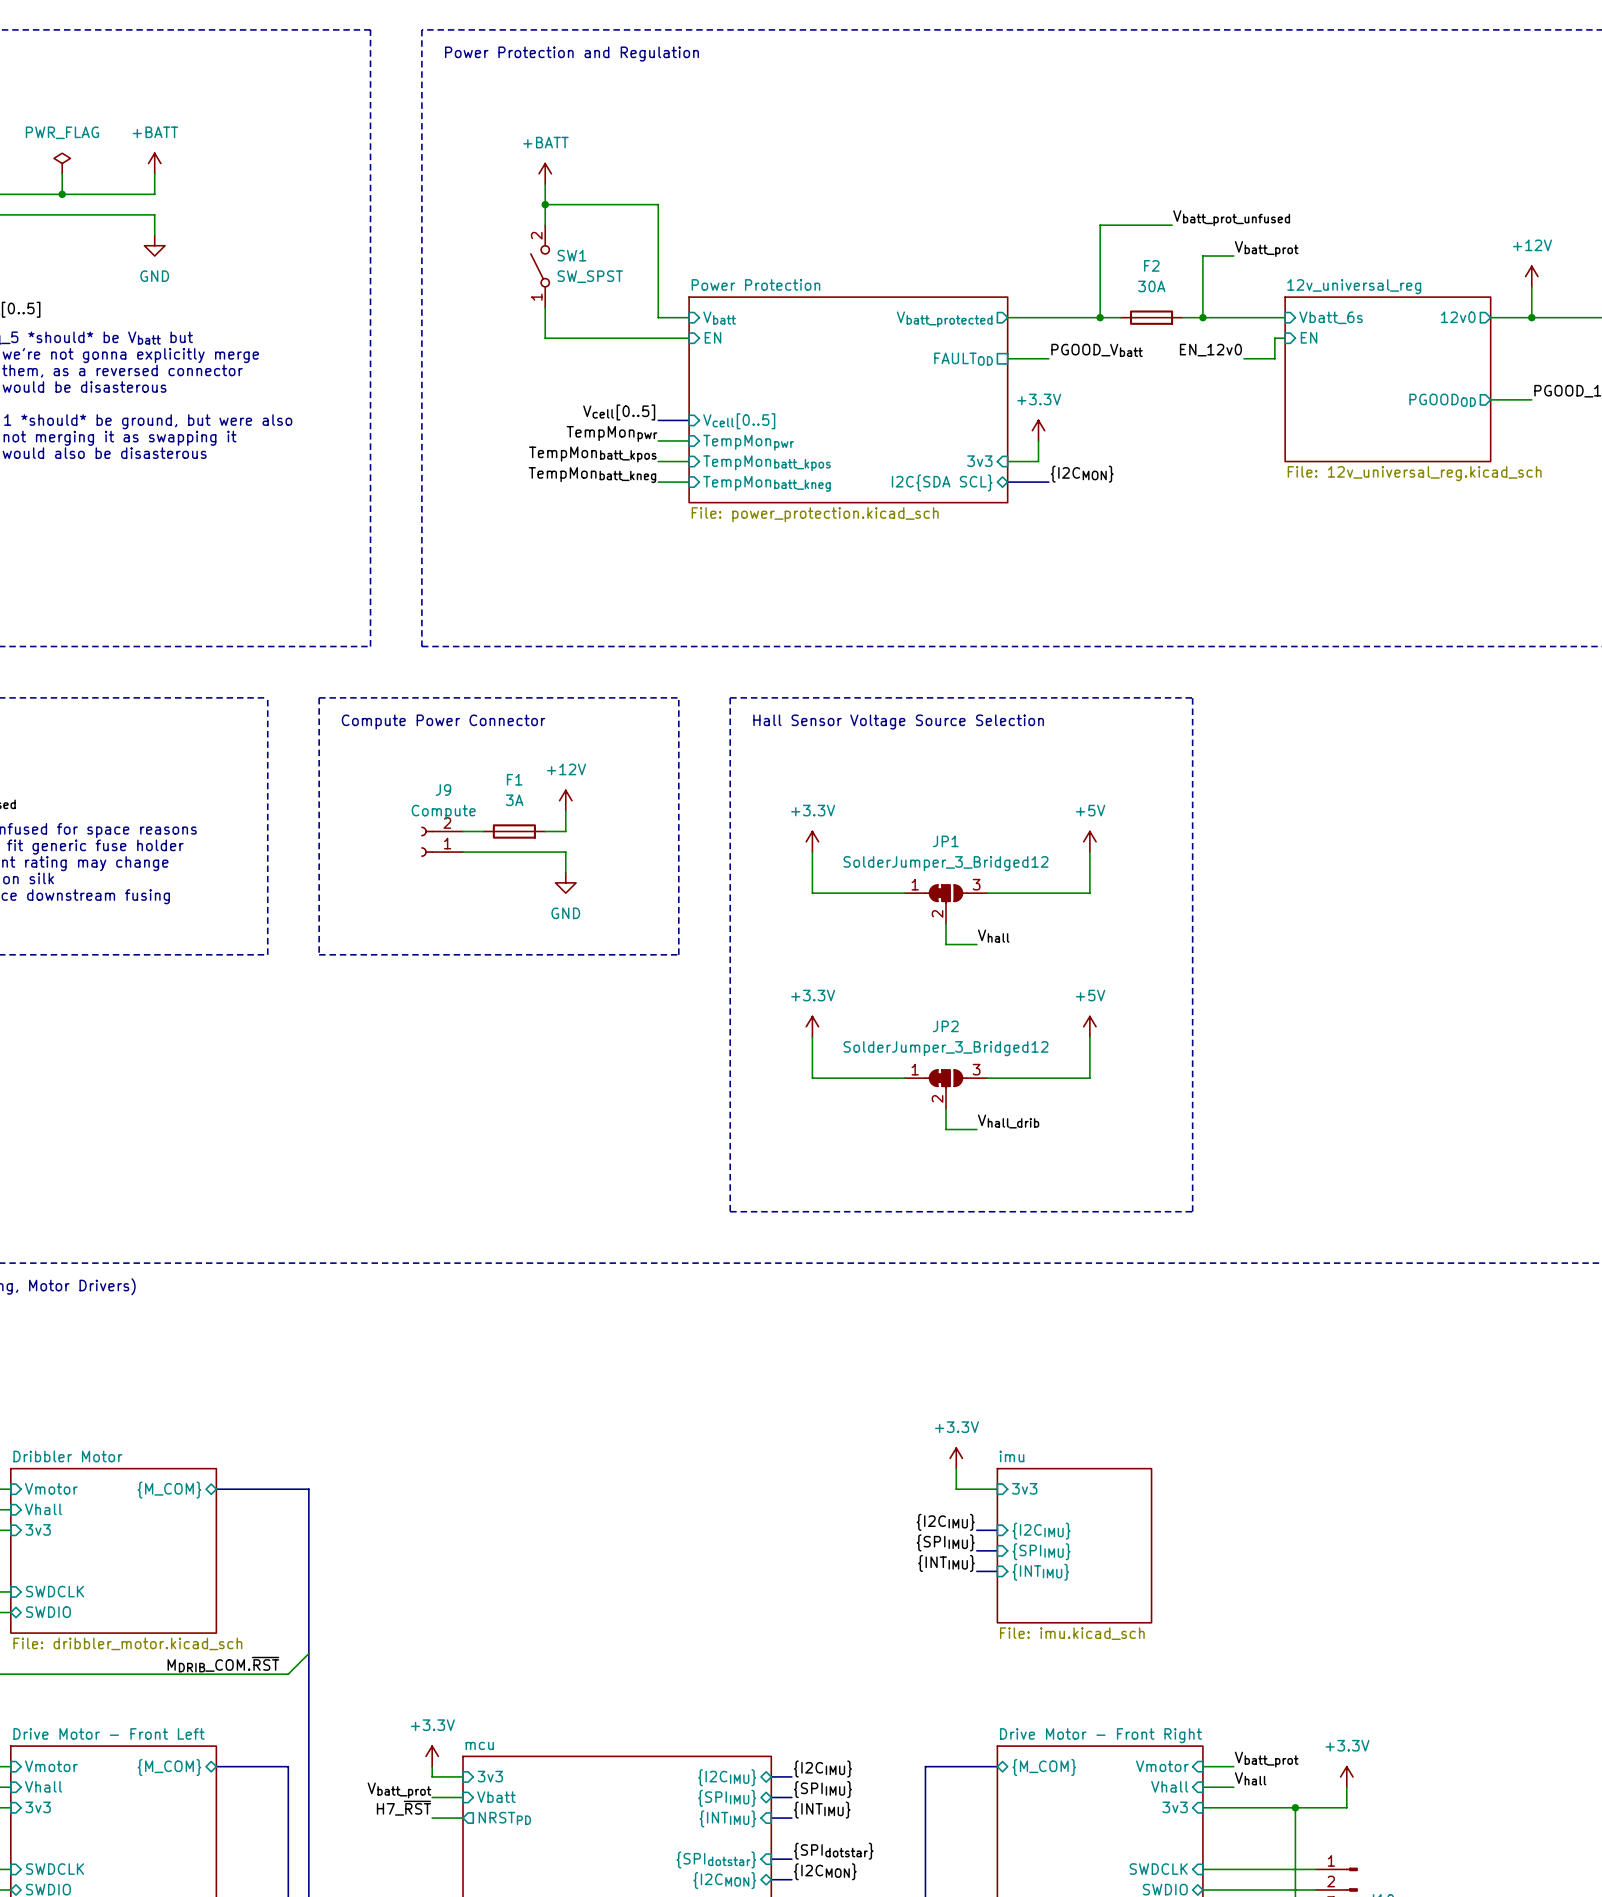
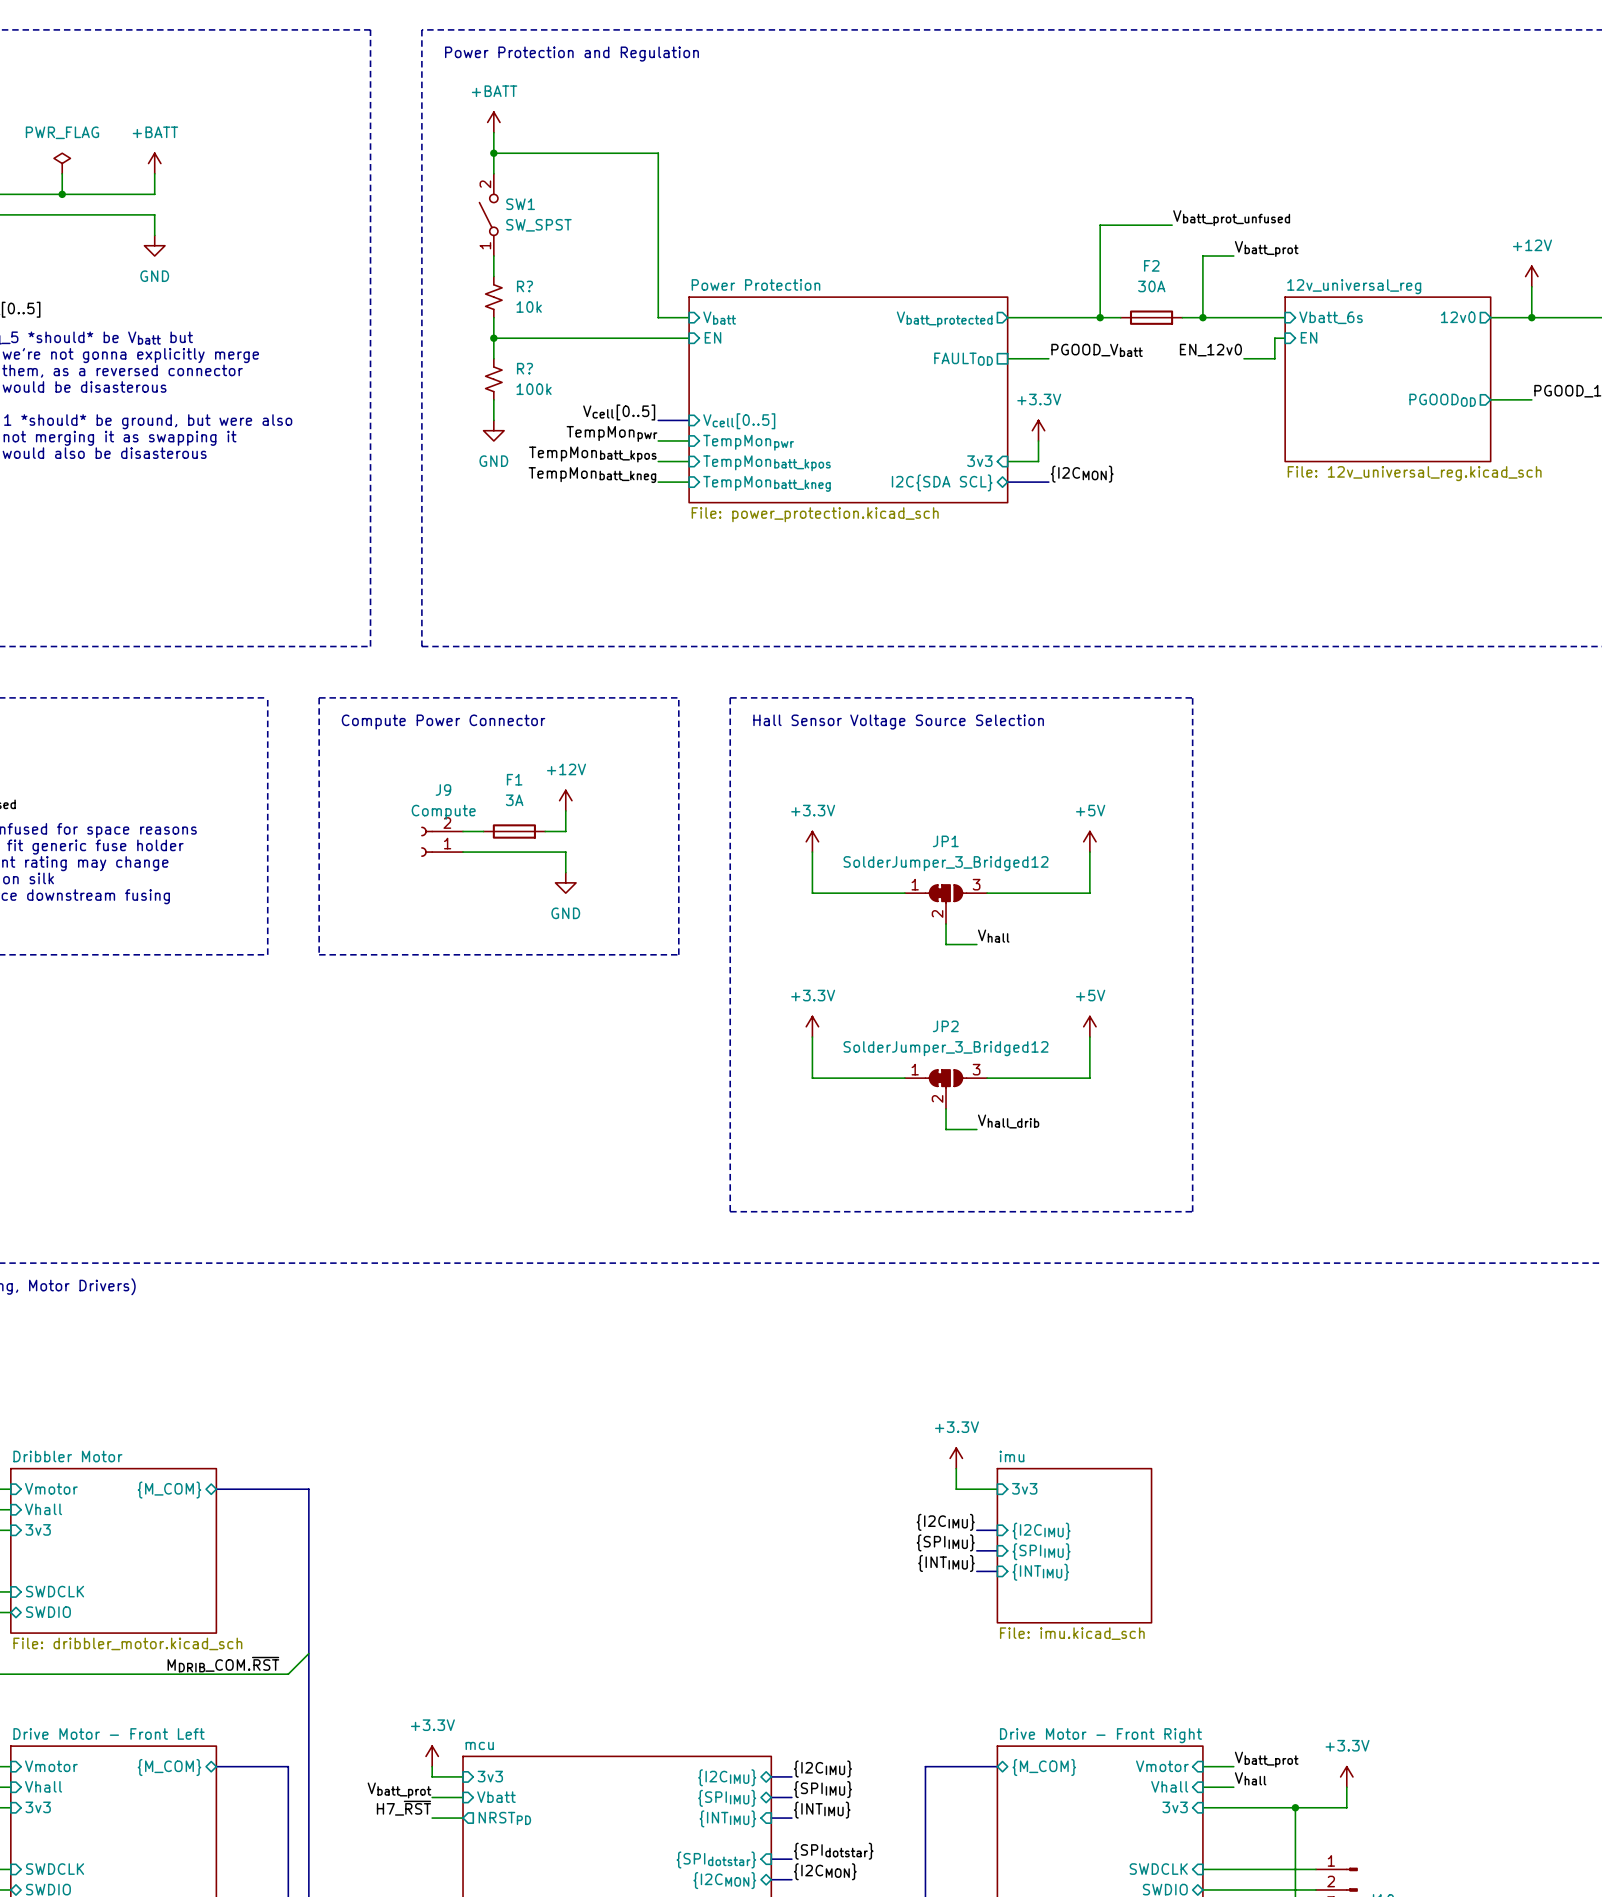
junction: none -> (493, 153)
power symbol position: +BATT (545, 173) -> +BATT (493, 122)
wire: (545, 184) (545, 225) -> (493, 132) (493, 173)
wire: (545, 204) (658, 204) -> (493, 153) (658, 153) (658, 204)
junction: (545, 204) -> none
wire: none -> (493, 256) (493, 276)
SW1 position: (540, 266) -> (488, 214)
R?: none -> 10k (493, 297)
wire: (545, 307) (545, 338) -> (493, 338) (545, 338)
wire: none -> (493, 317) (493, 358)
junction: none -> (493, 338)
R?: none -> 100k (493, 379)
wire: none -> (493, 399) (493, 420)
power symbol: none -> GND (493, 430)

